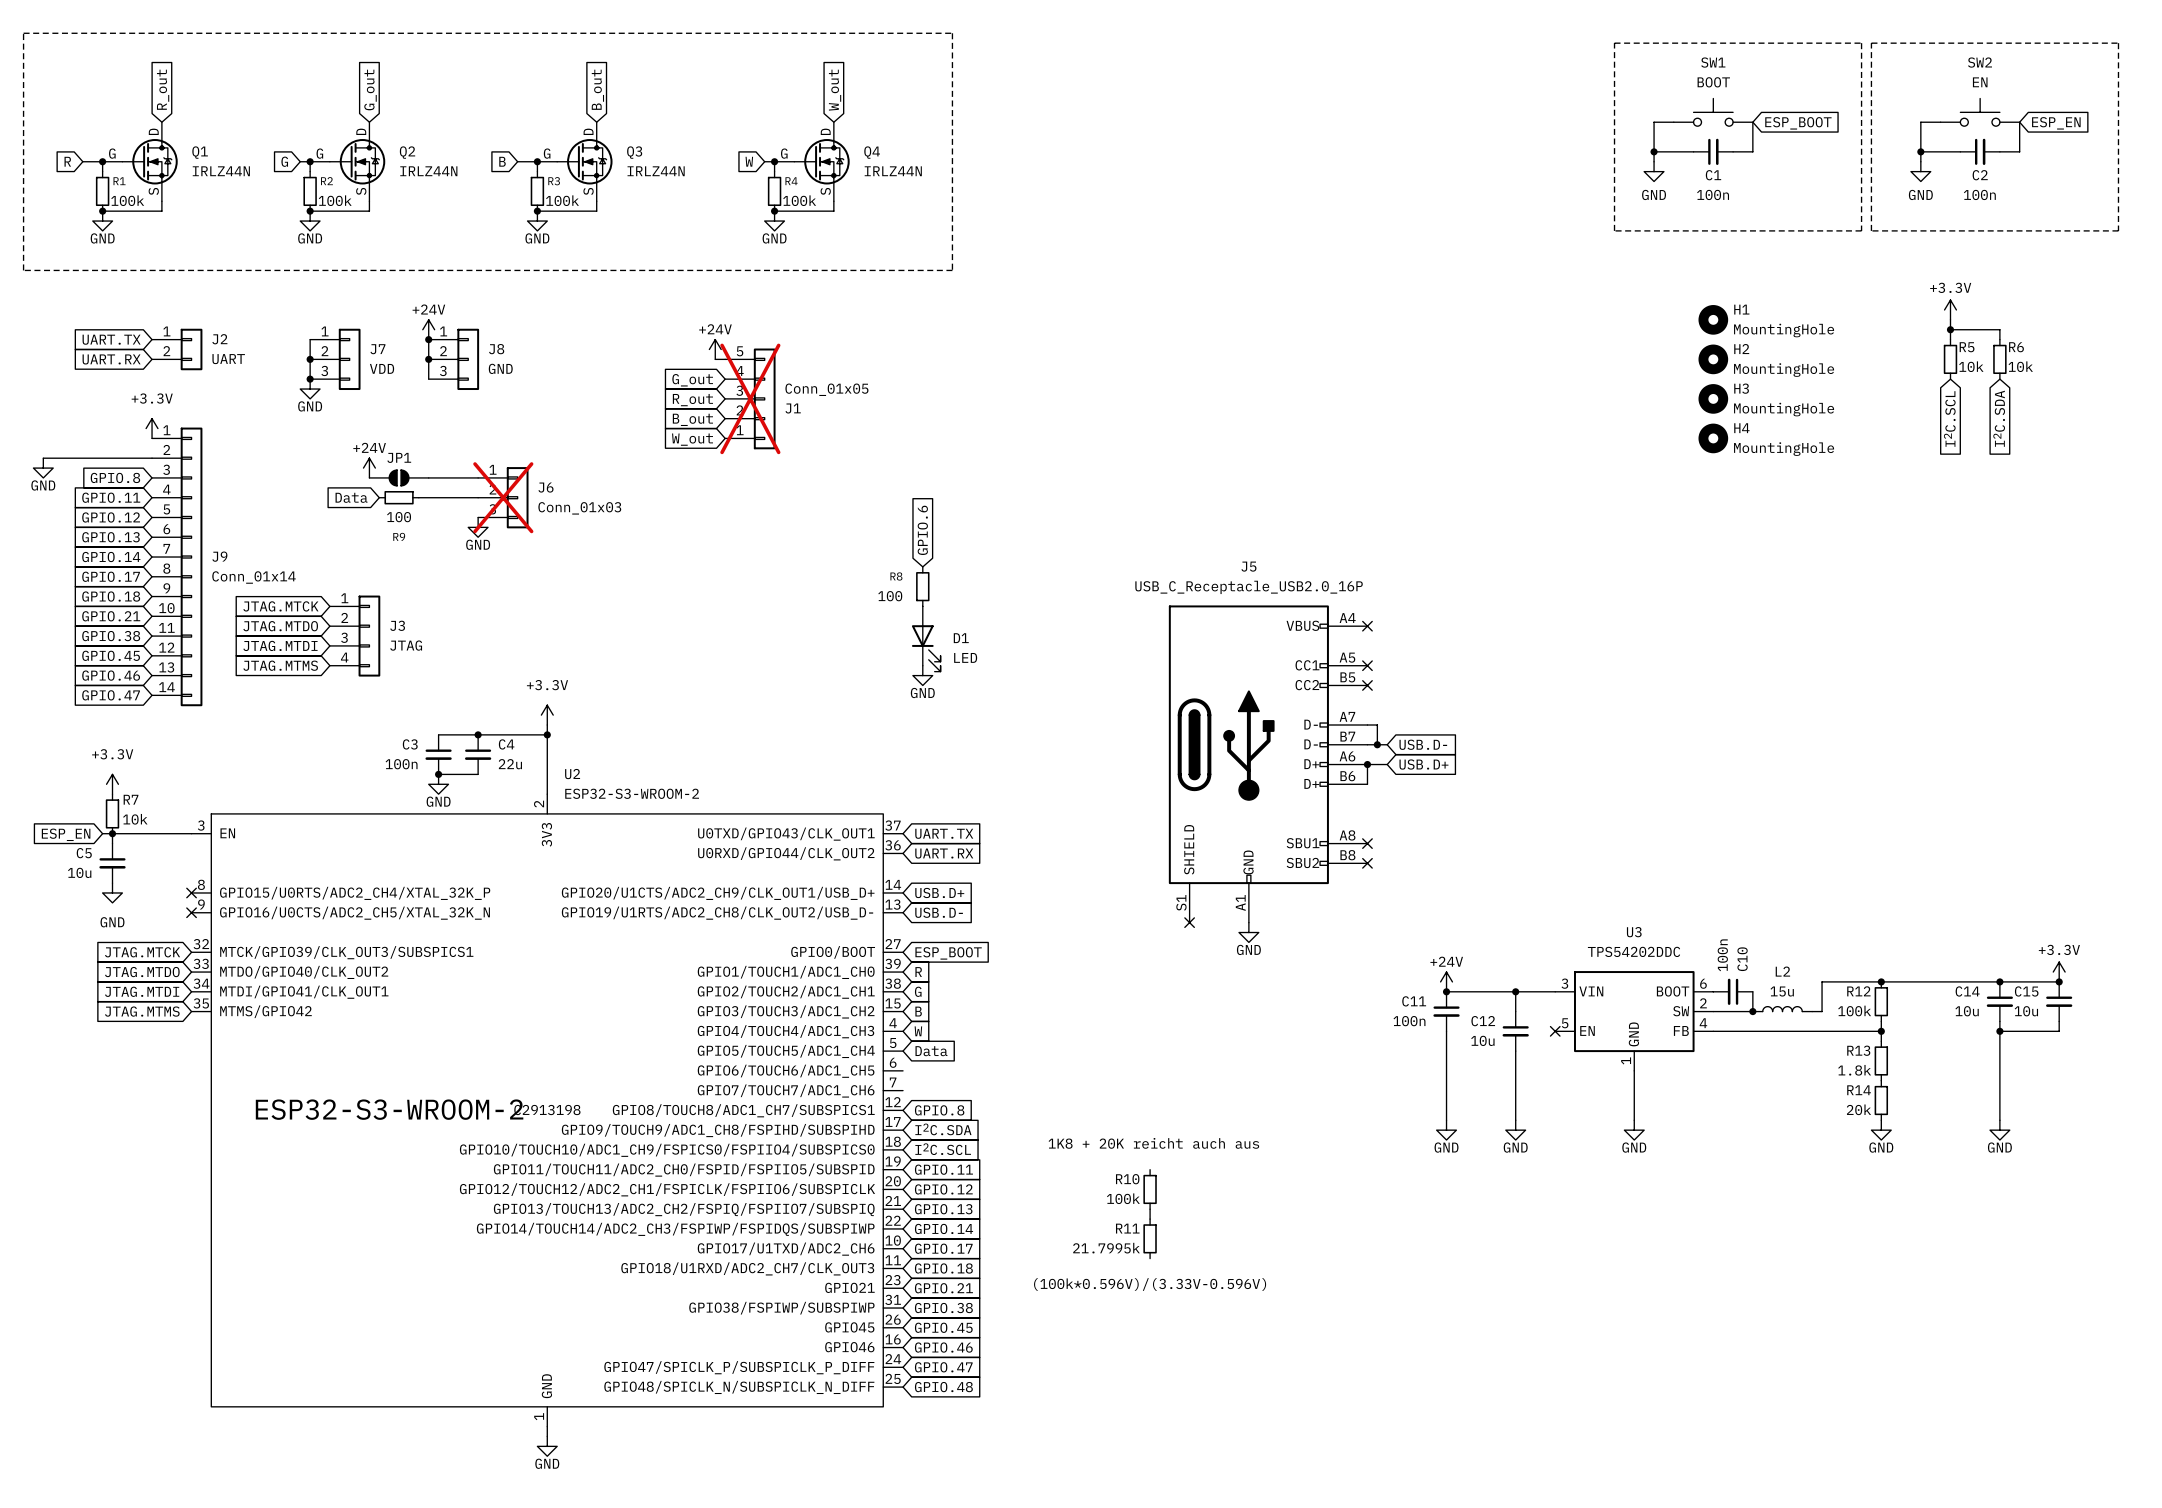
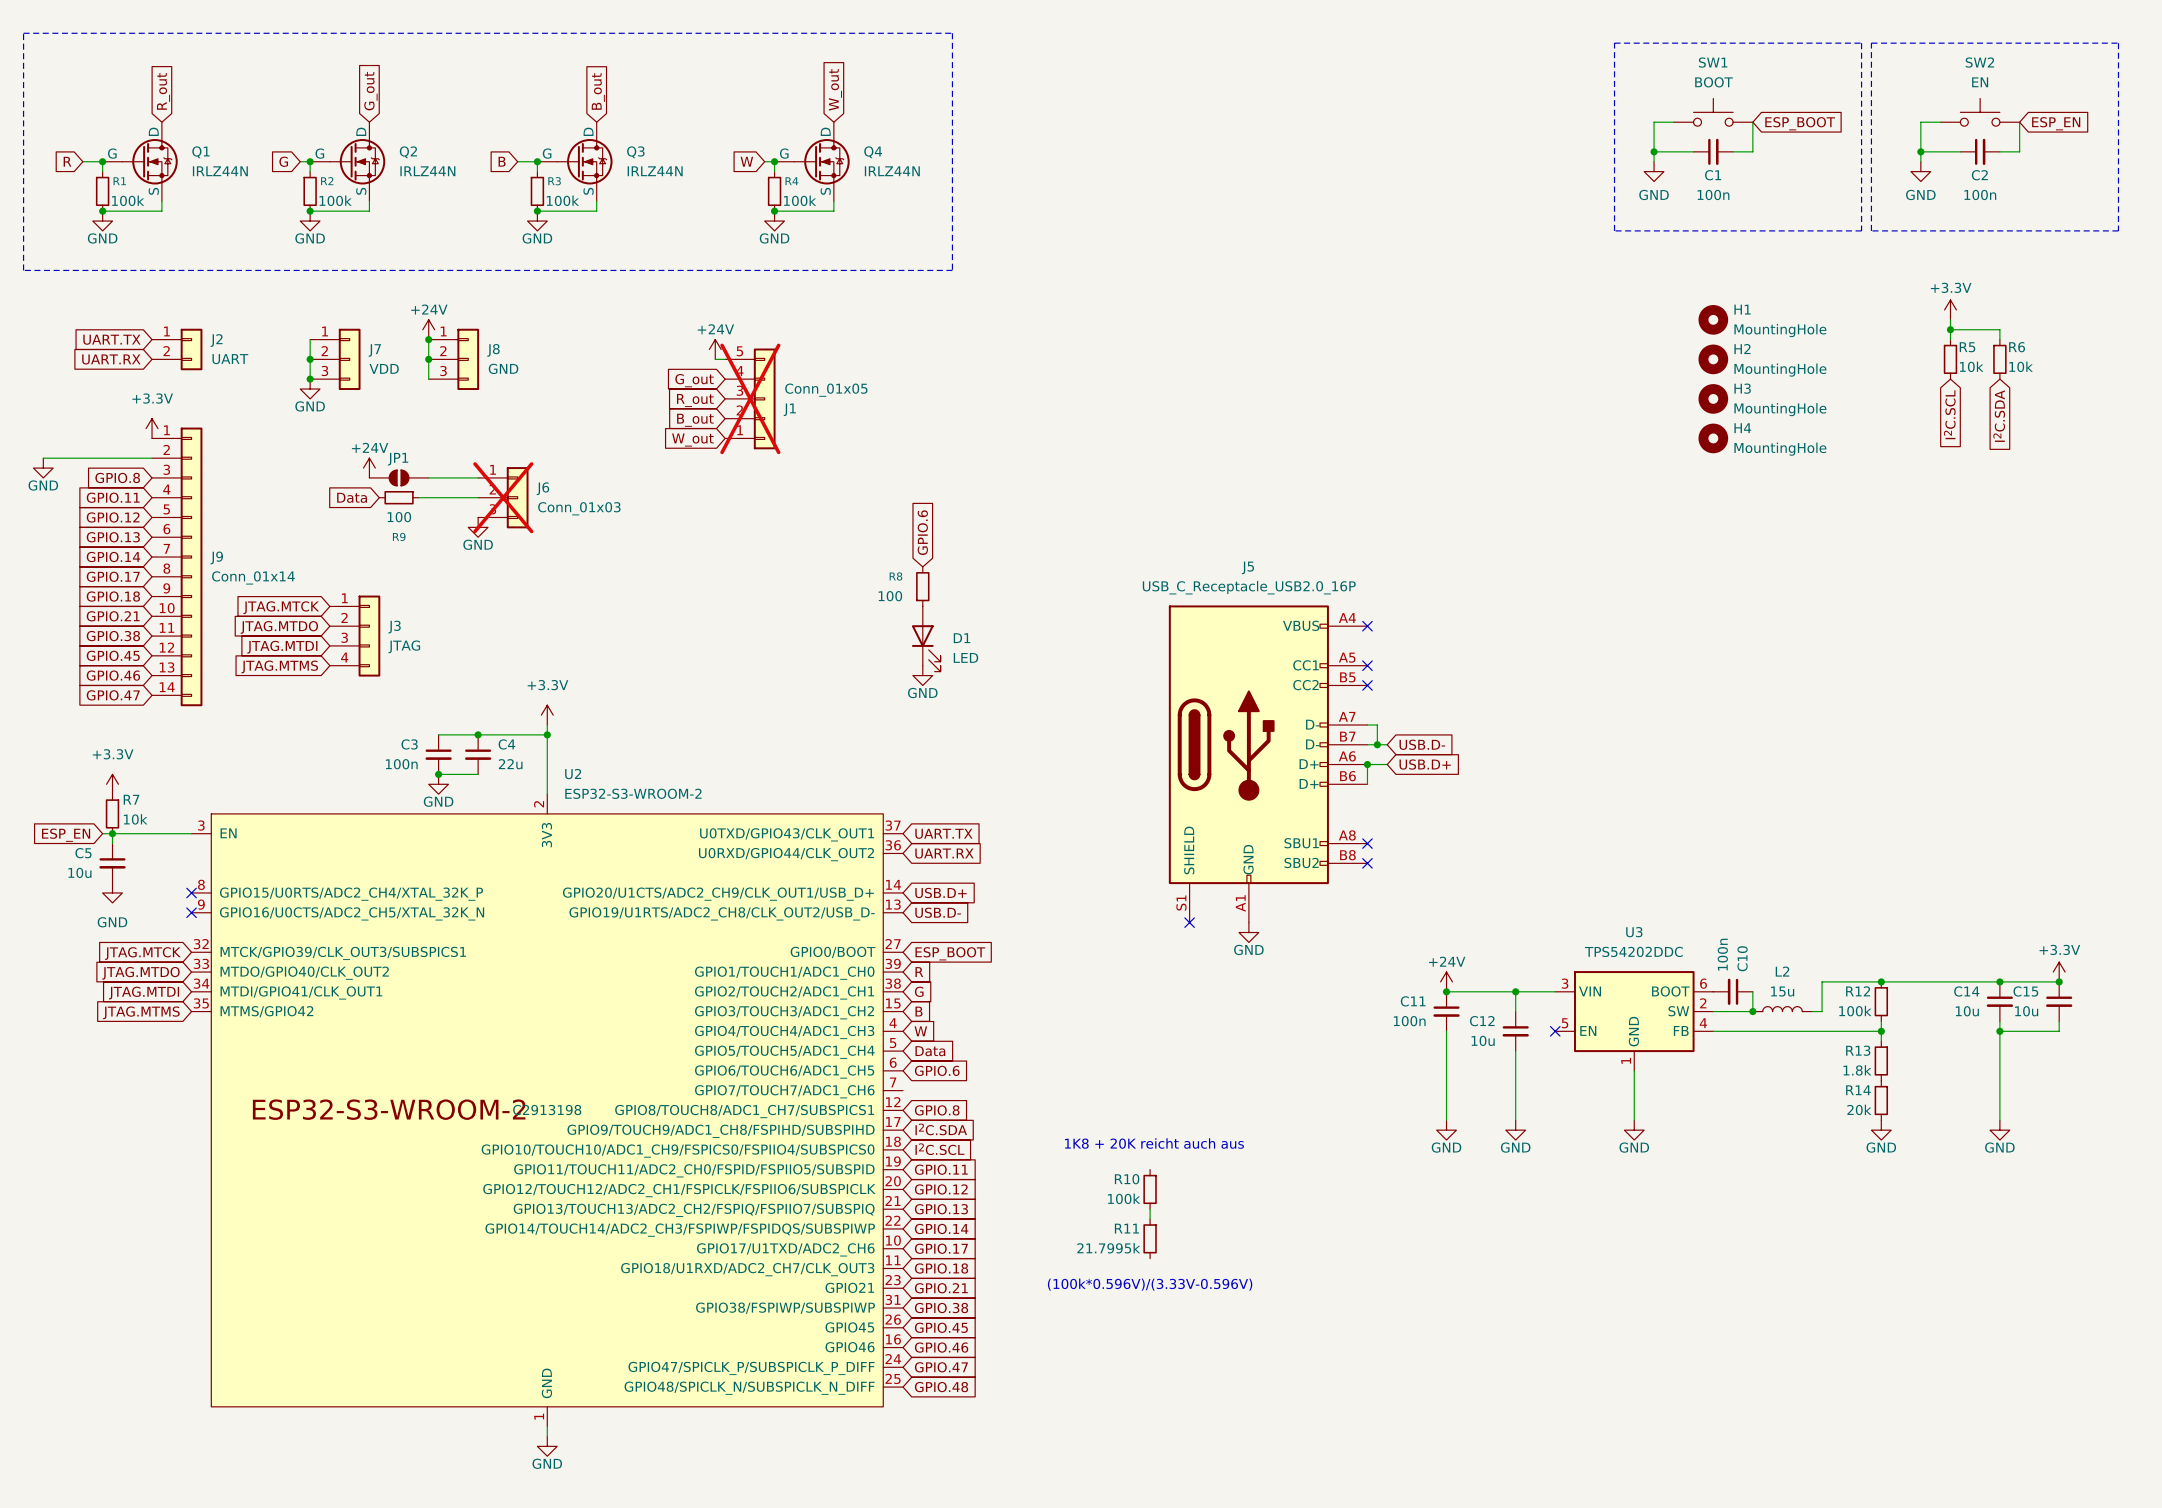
global label: none -> GPIO.6 (937, 1070)

